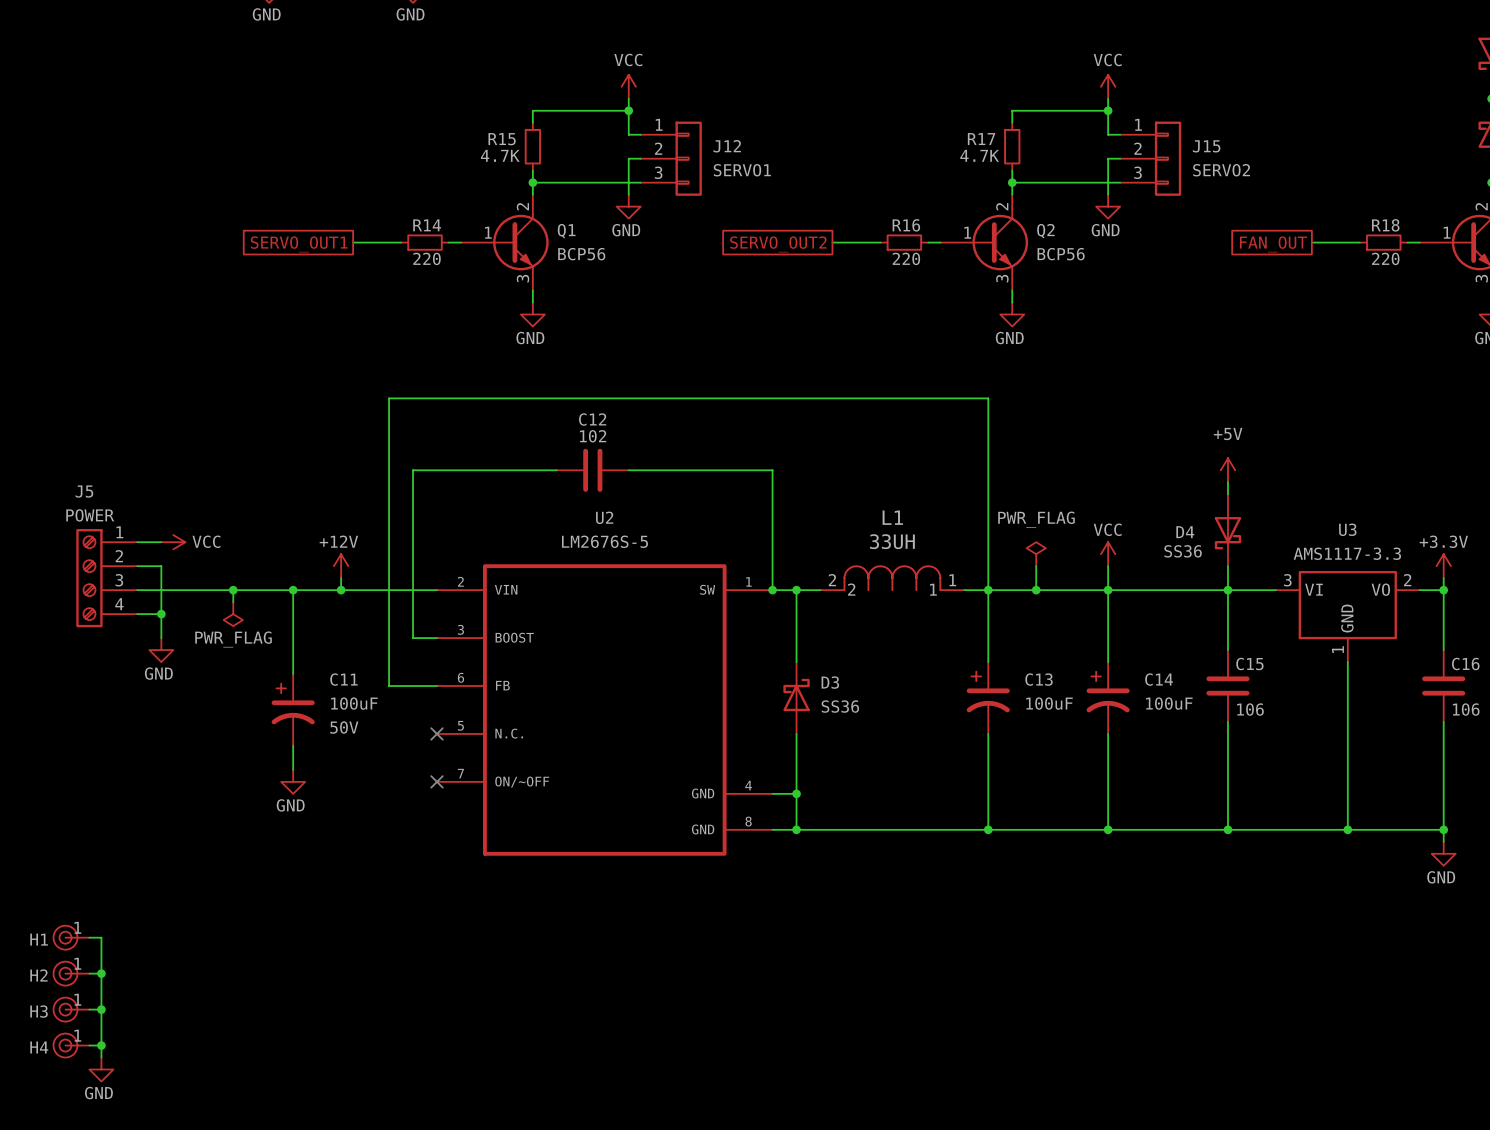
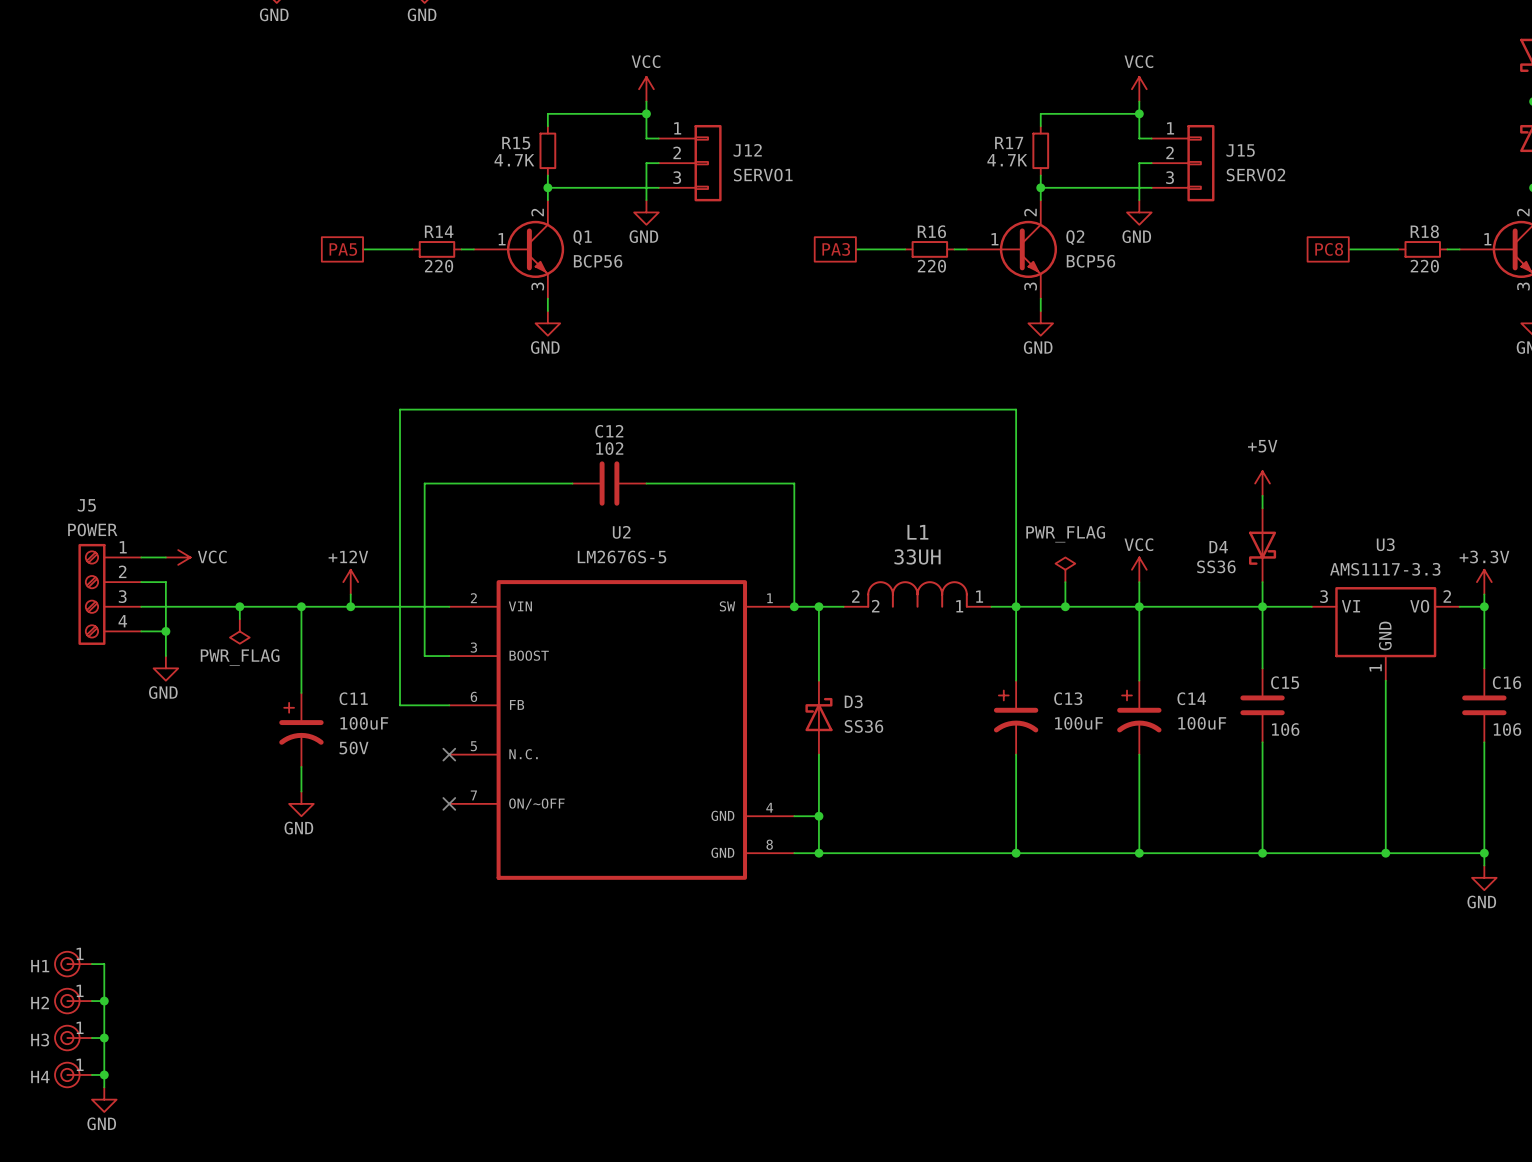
global label: SERVO_OUT1 (299, 244) -> PA5 (343, 249)
global label: SERVO_OUT2 (778, 244) -> PA3 (836, 249)
global label: FAN_OUT (1273, 244) -> PC8 (1329, 249)

